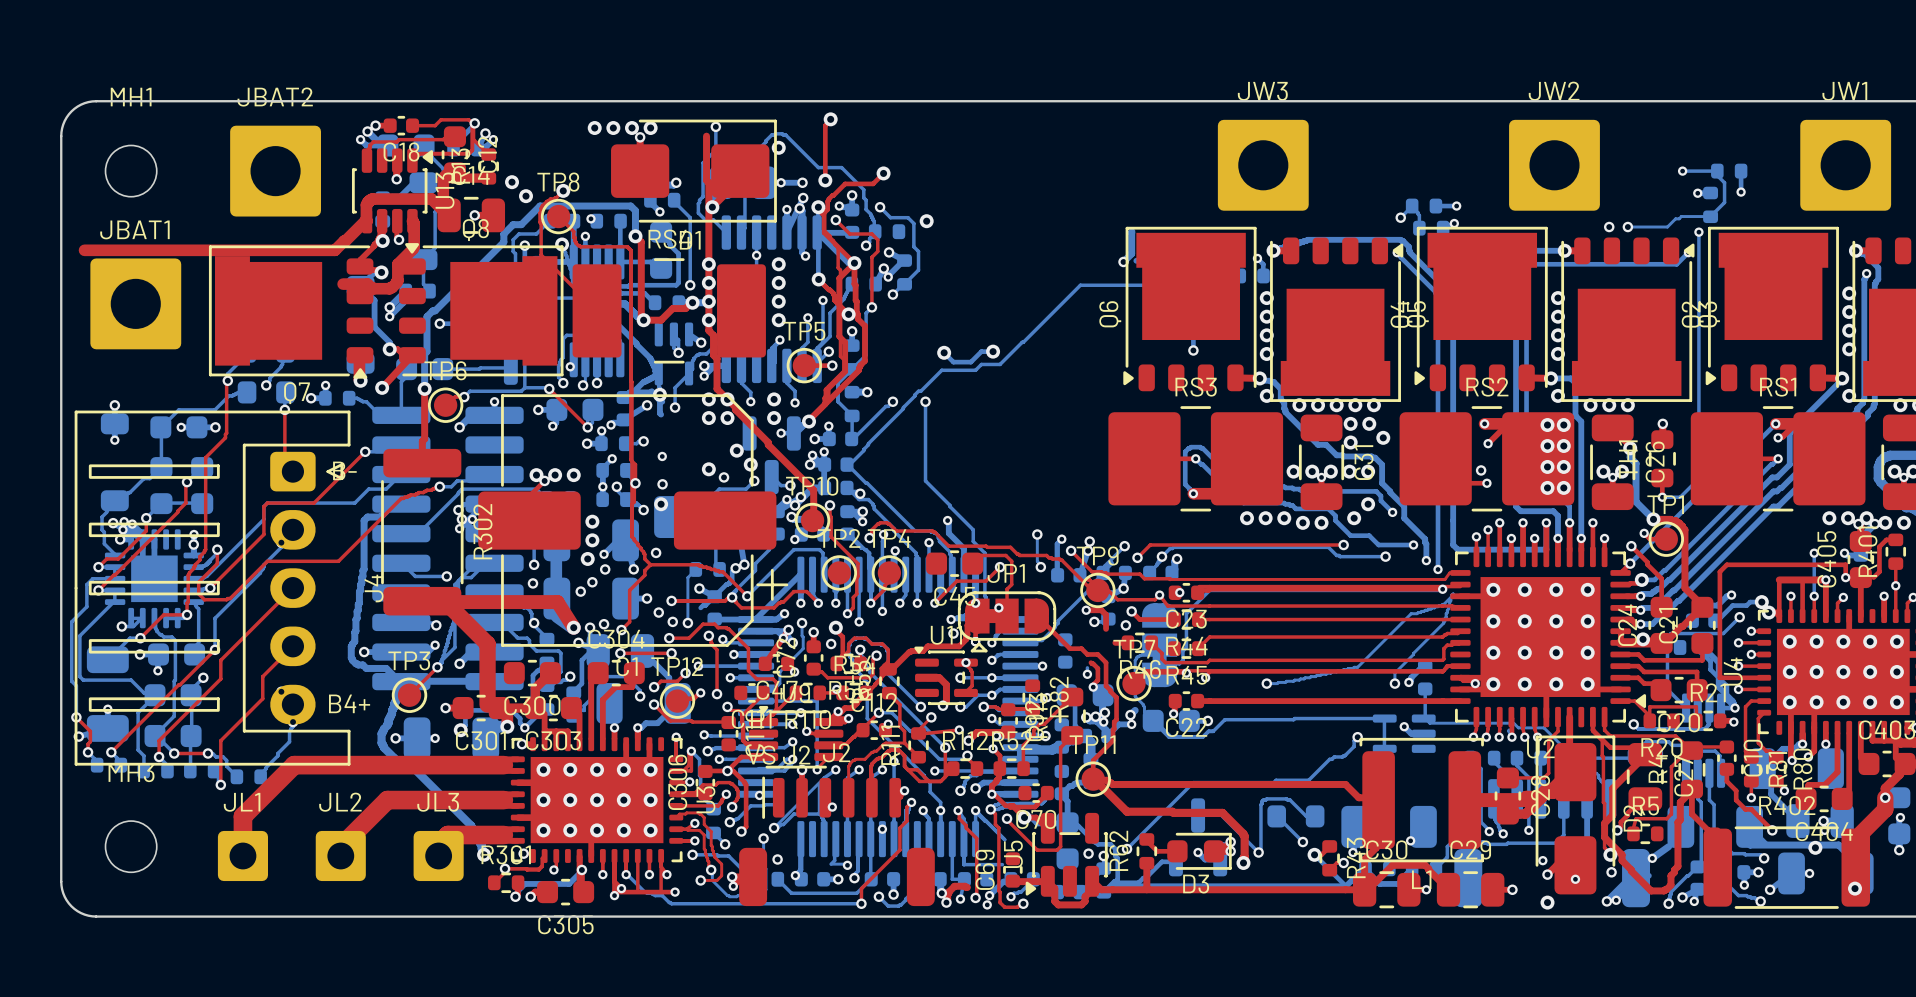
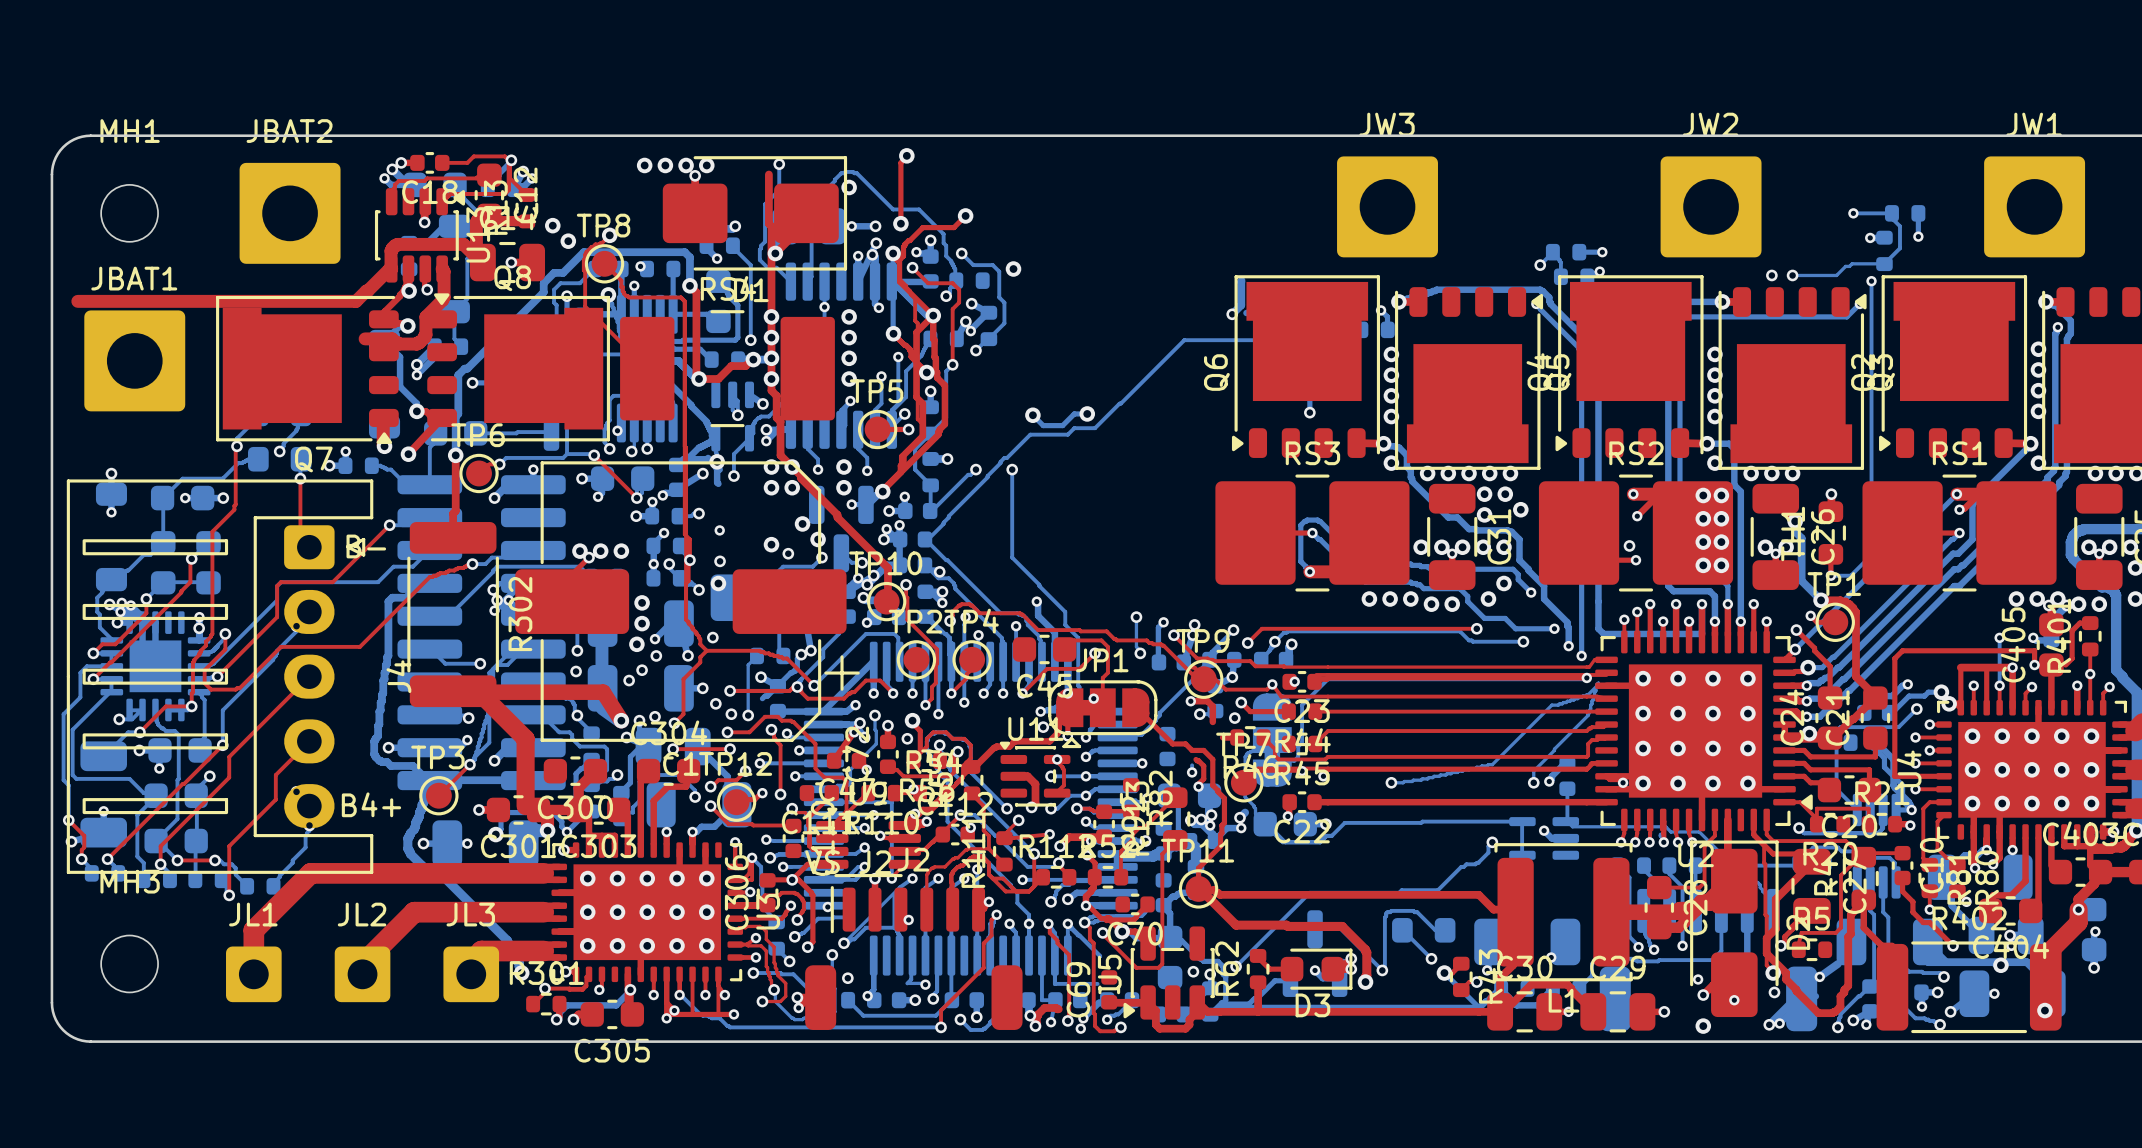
via: (882, 829) -> none

